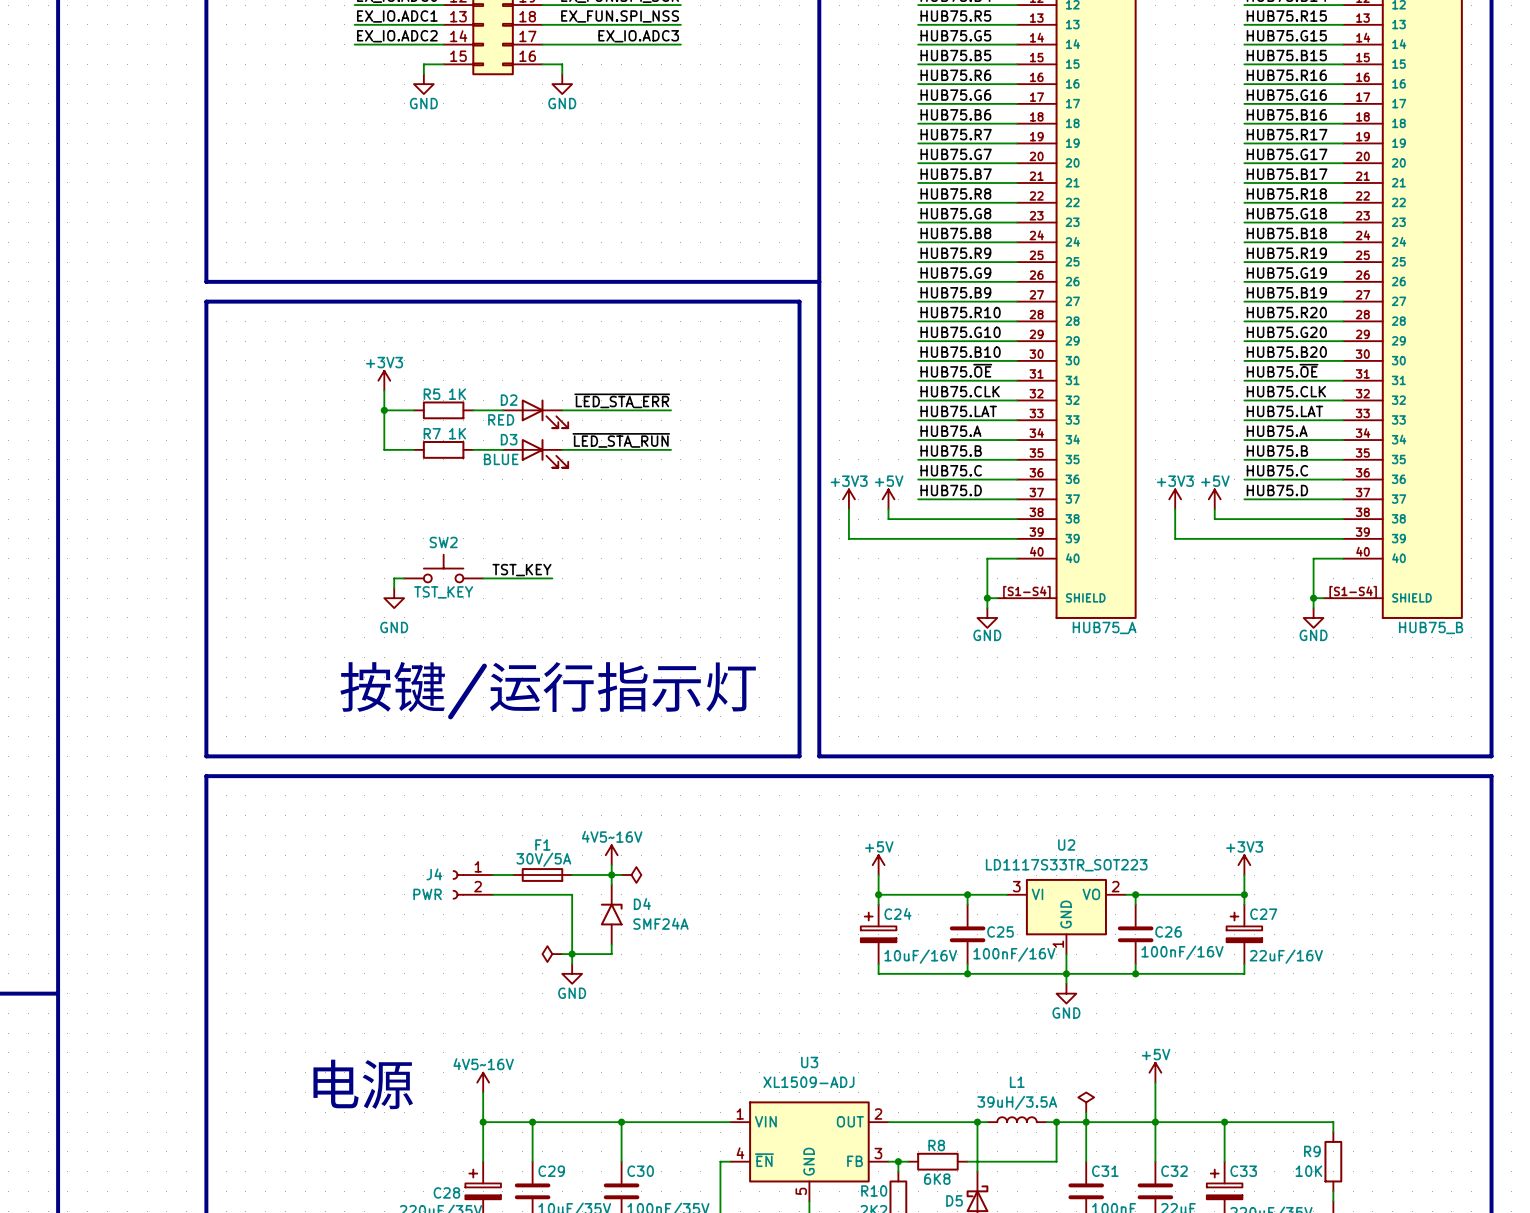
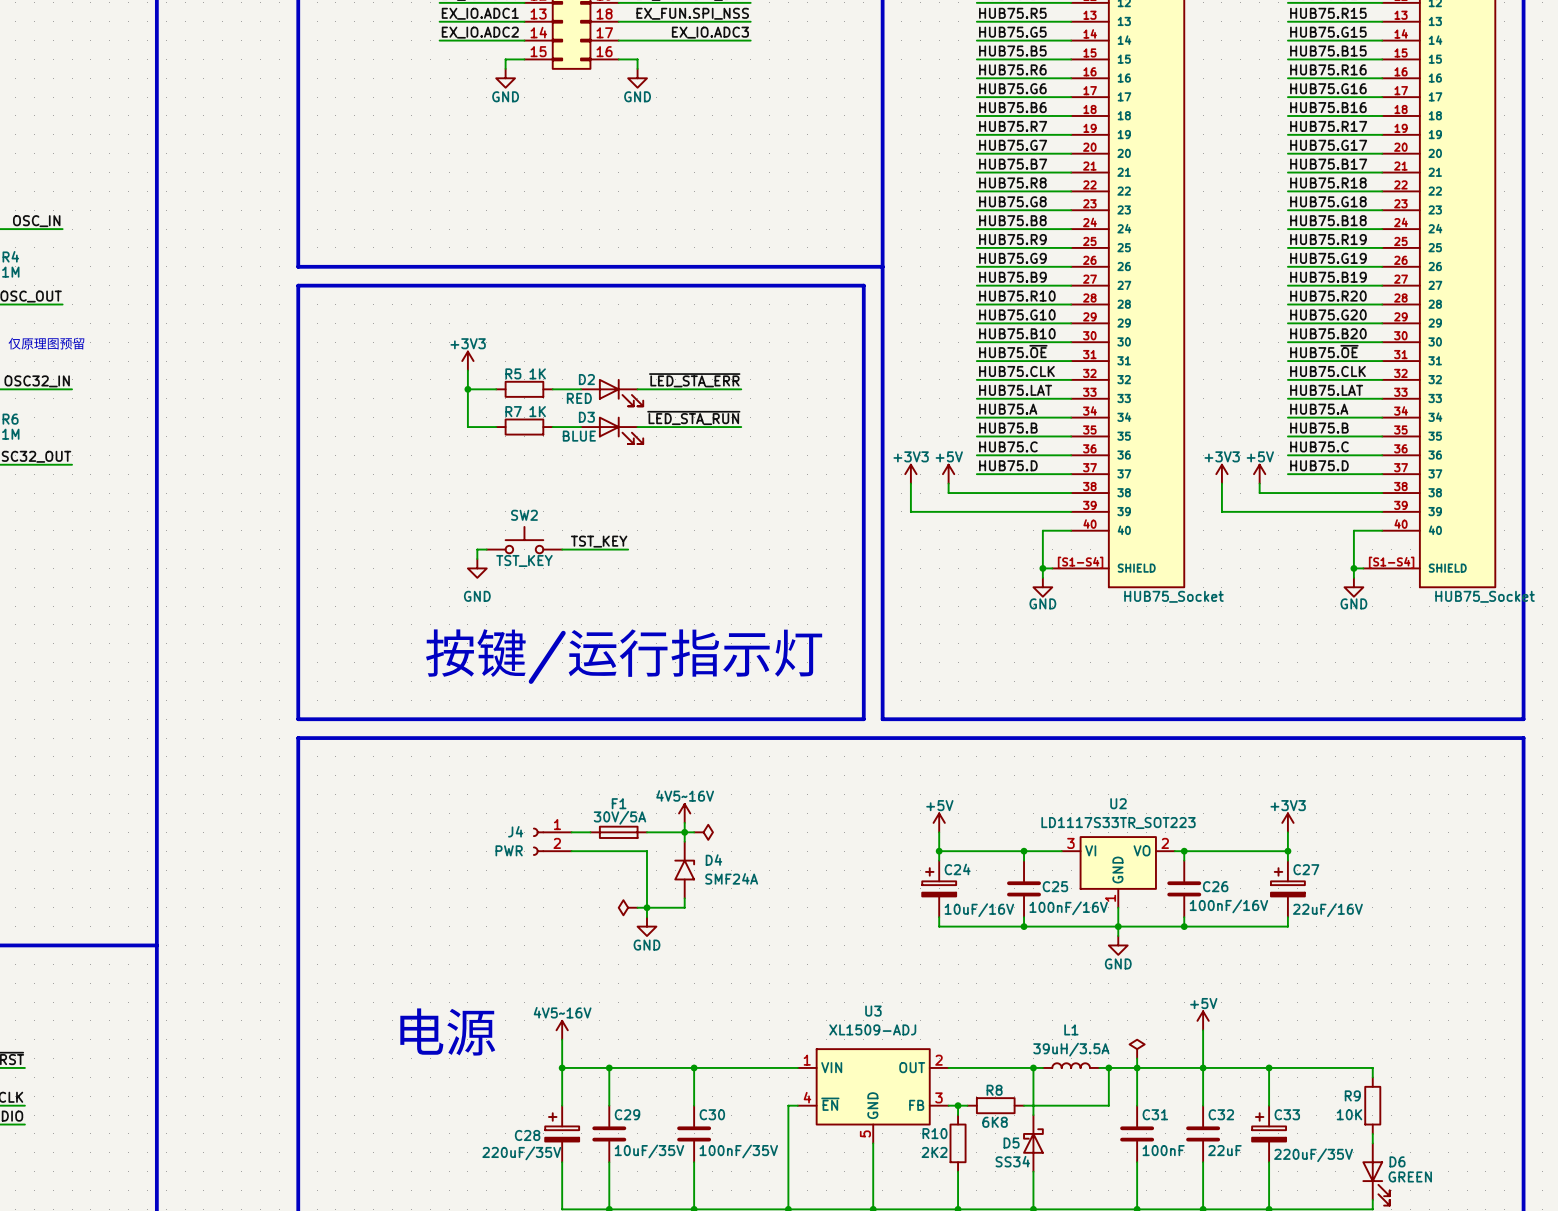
SW2 text: none -> TST_KEY (524, 560)
SW2 value: TST_KEY (443, 592) -> none
part value: HUB75_A (1104, 627) -> HUB75_Socket (1173, 596)
part value: HUB75_B (1431, 627) -> HUB75_Socket (1485, 596)

